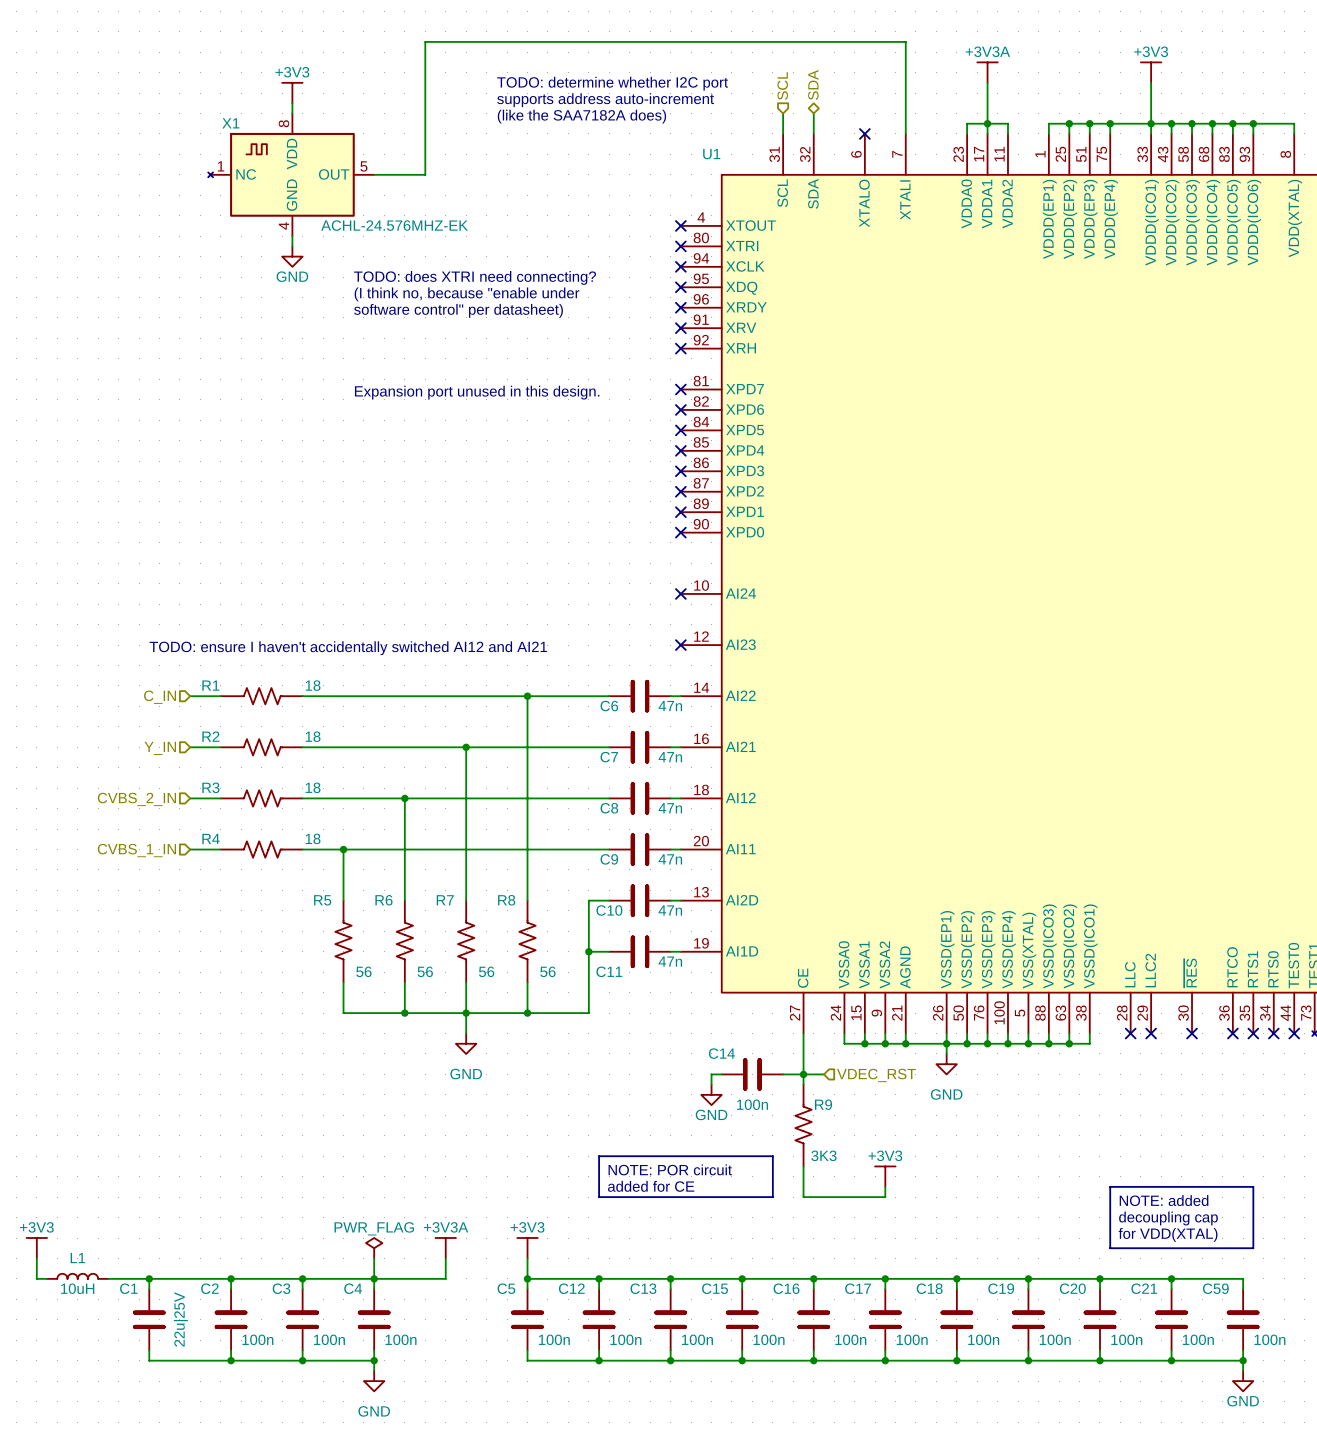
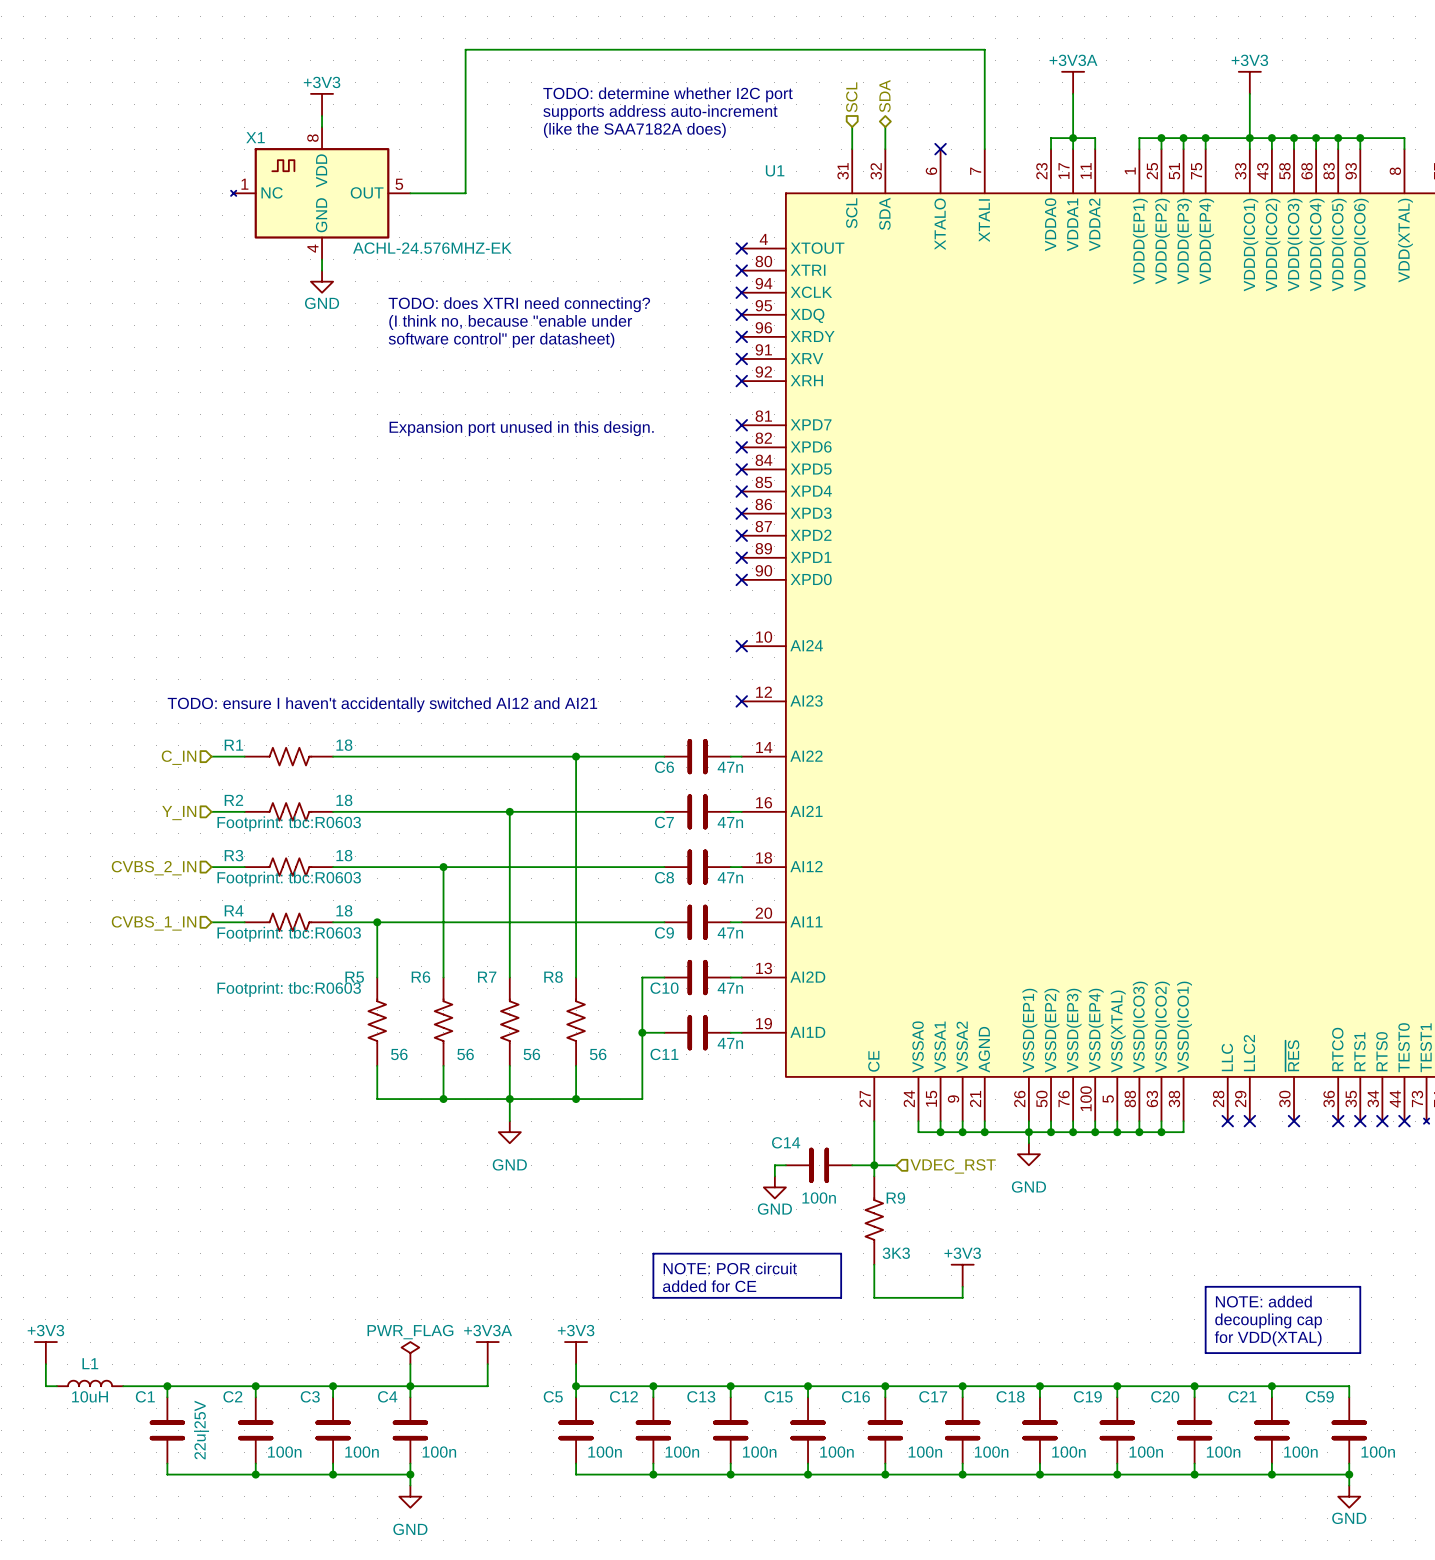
R1 text: none -> Footprint: tbc:R0603 (289, 823)
R2 text: none -> Footprint: tbc:R0603 (289, 879)
R3 text: none -> Footprint: tbc:R0603 (289, 934)
R4 text: none -> Footprint: tbc:R0603 (289, 989)

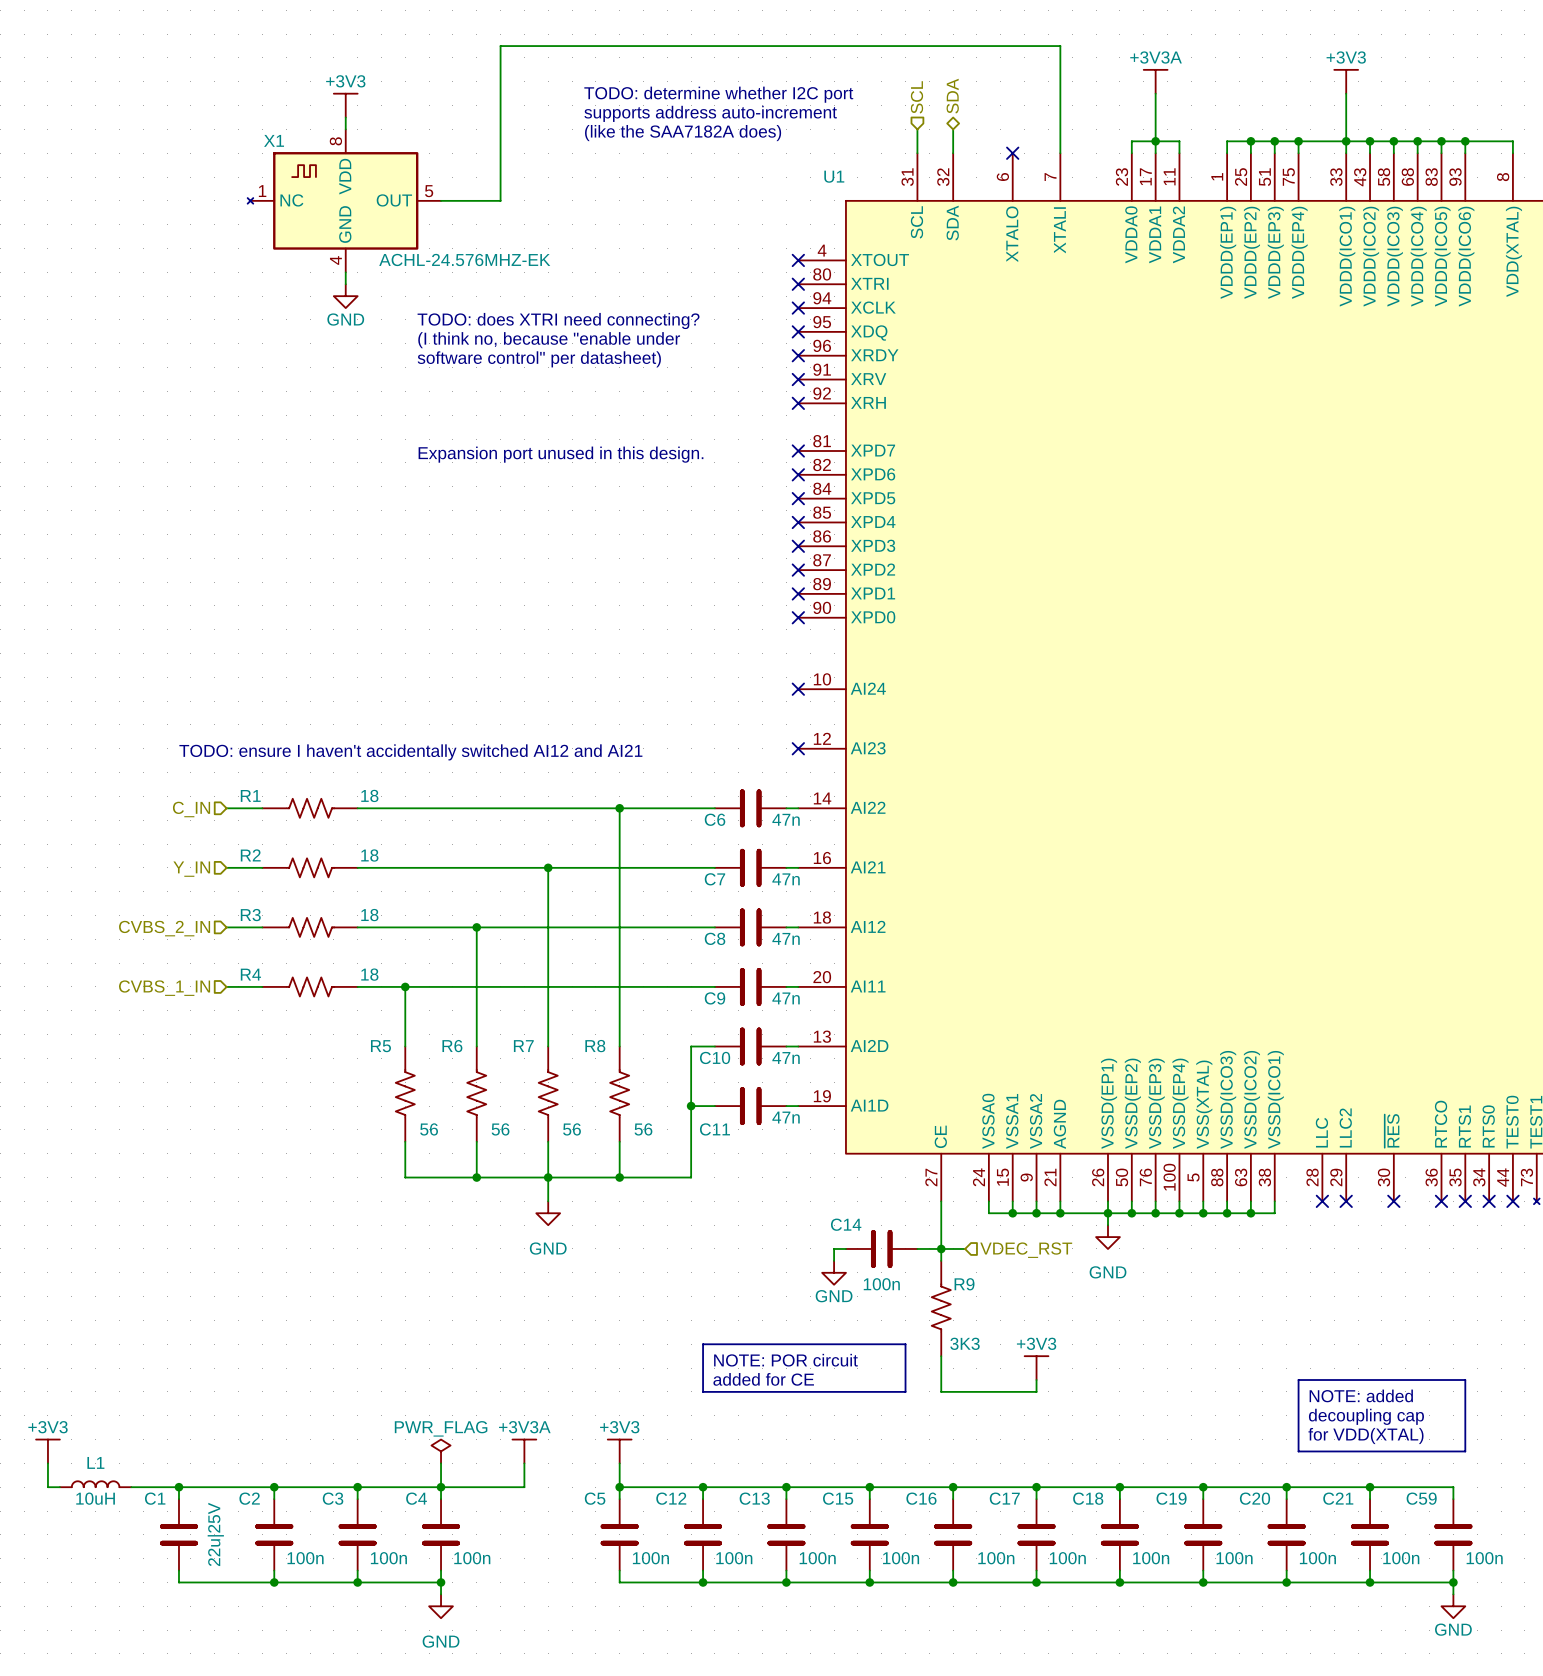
R1 text: Footprint: tbc:R0603 (289, 823) -> none
R2 text: Footprint: tbc:R0603 (289, 879) -> none
R3 text: Footprint: tbc:R0603 (289, 934) -> none
R4 text: Footprint: tbc:R0603 (289, 989) -> none

